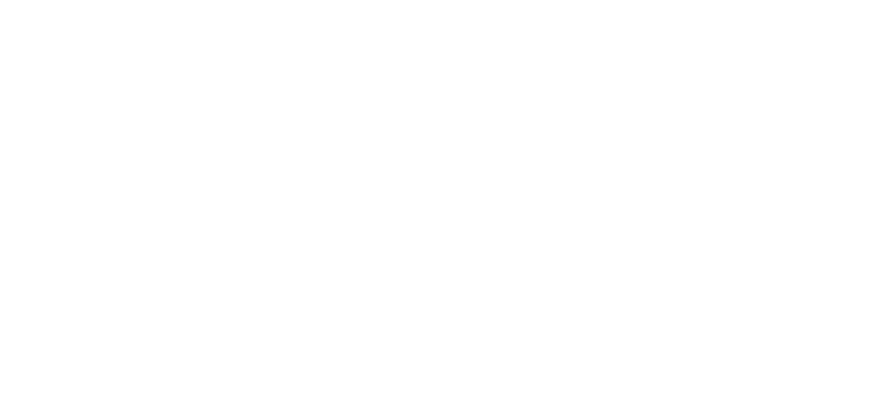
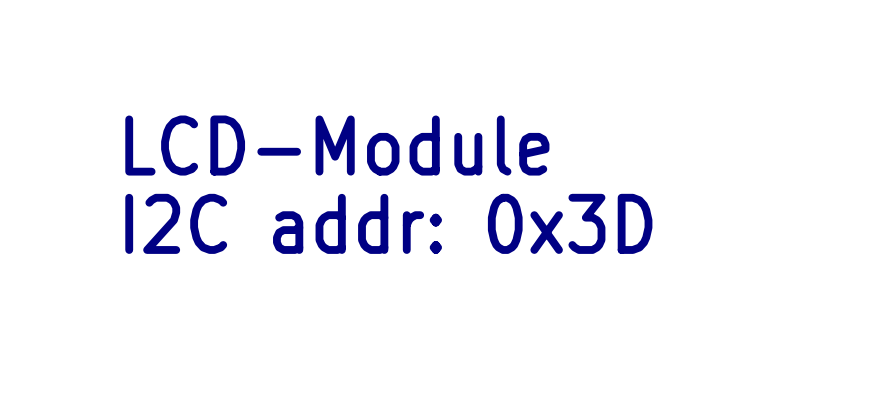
text: none -> LCD-Module (337, 145)
text: none -> I2C addr: 0x3D (388, 223)

